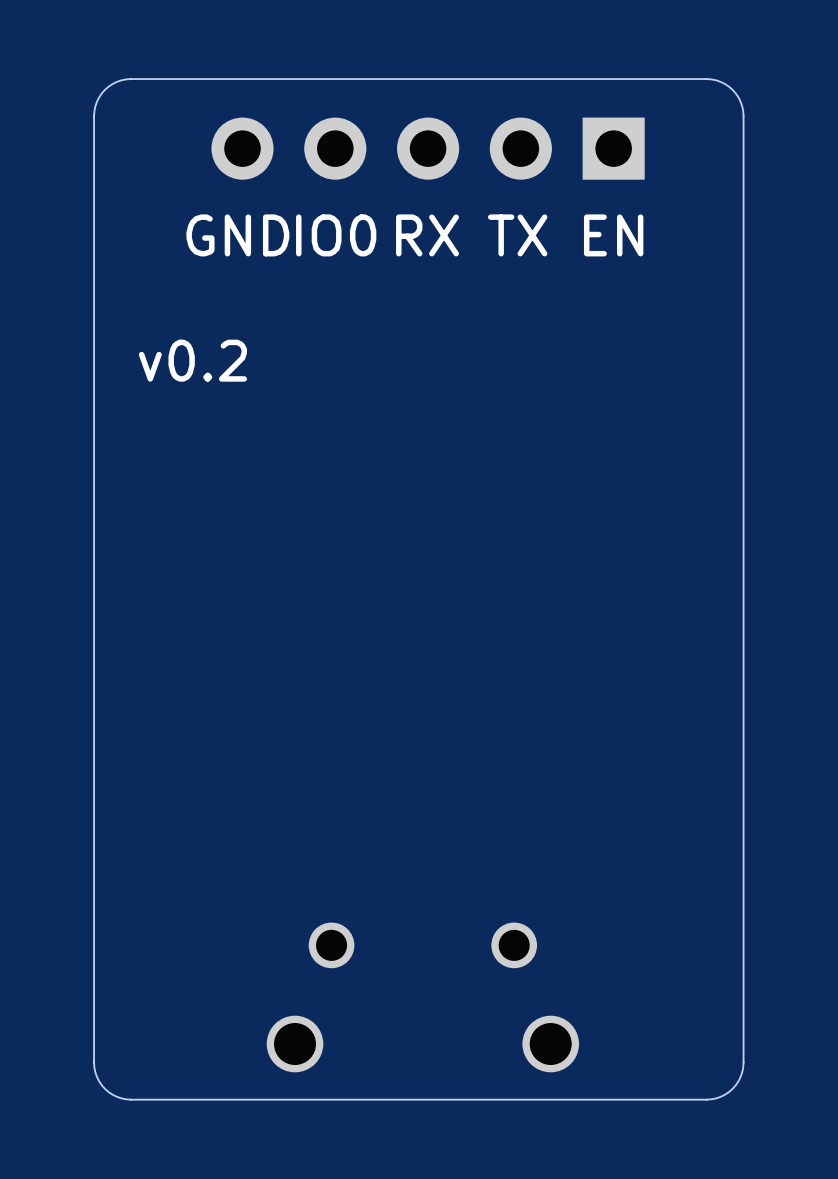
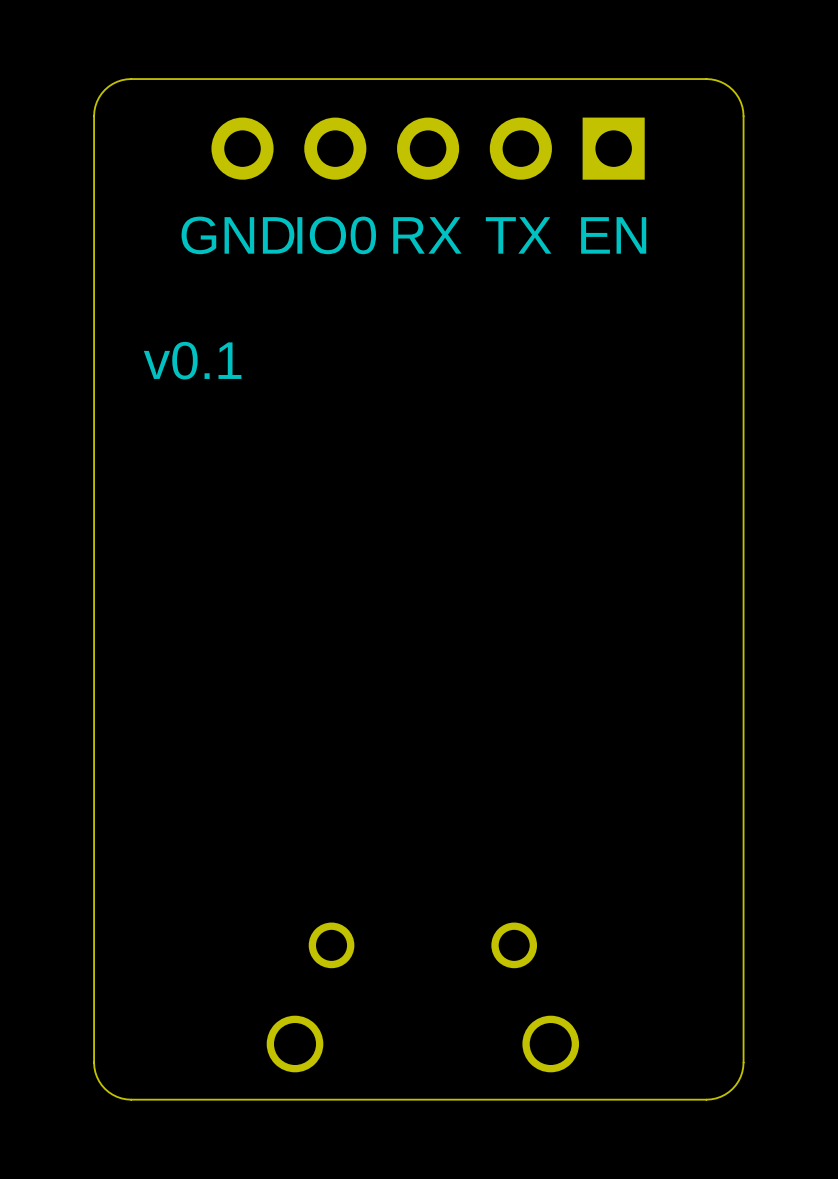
text: v0.2 (192, 360) -> v0.1 (192, 360)

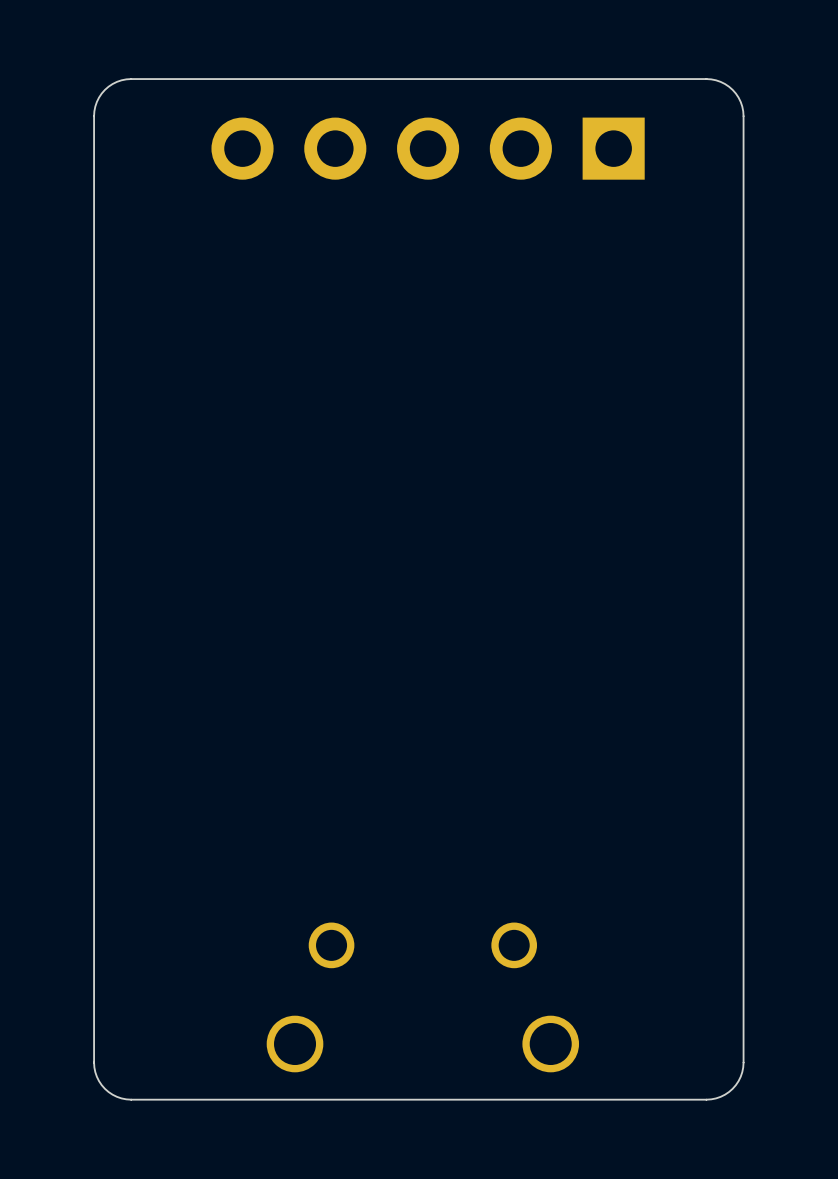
text: GND (237, 235) -> none
text: IO0 (336, 235) -> none
text: RX (427, 235) -> none
text: TX (518, 235) -> none
text: EN (613, 235) -> none
text: v0.1 (192, 360) -> none

